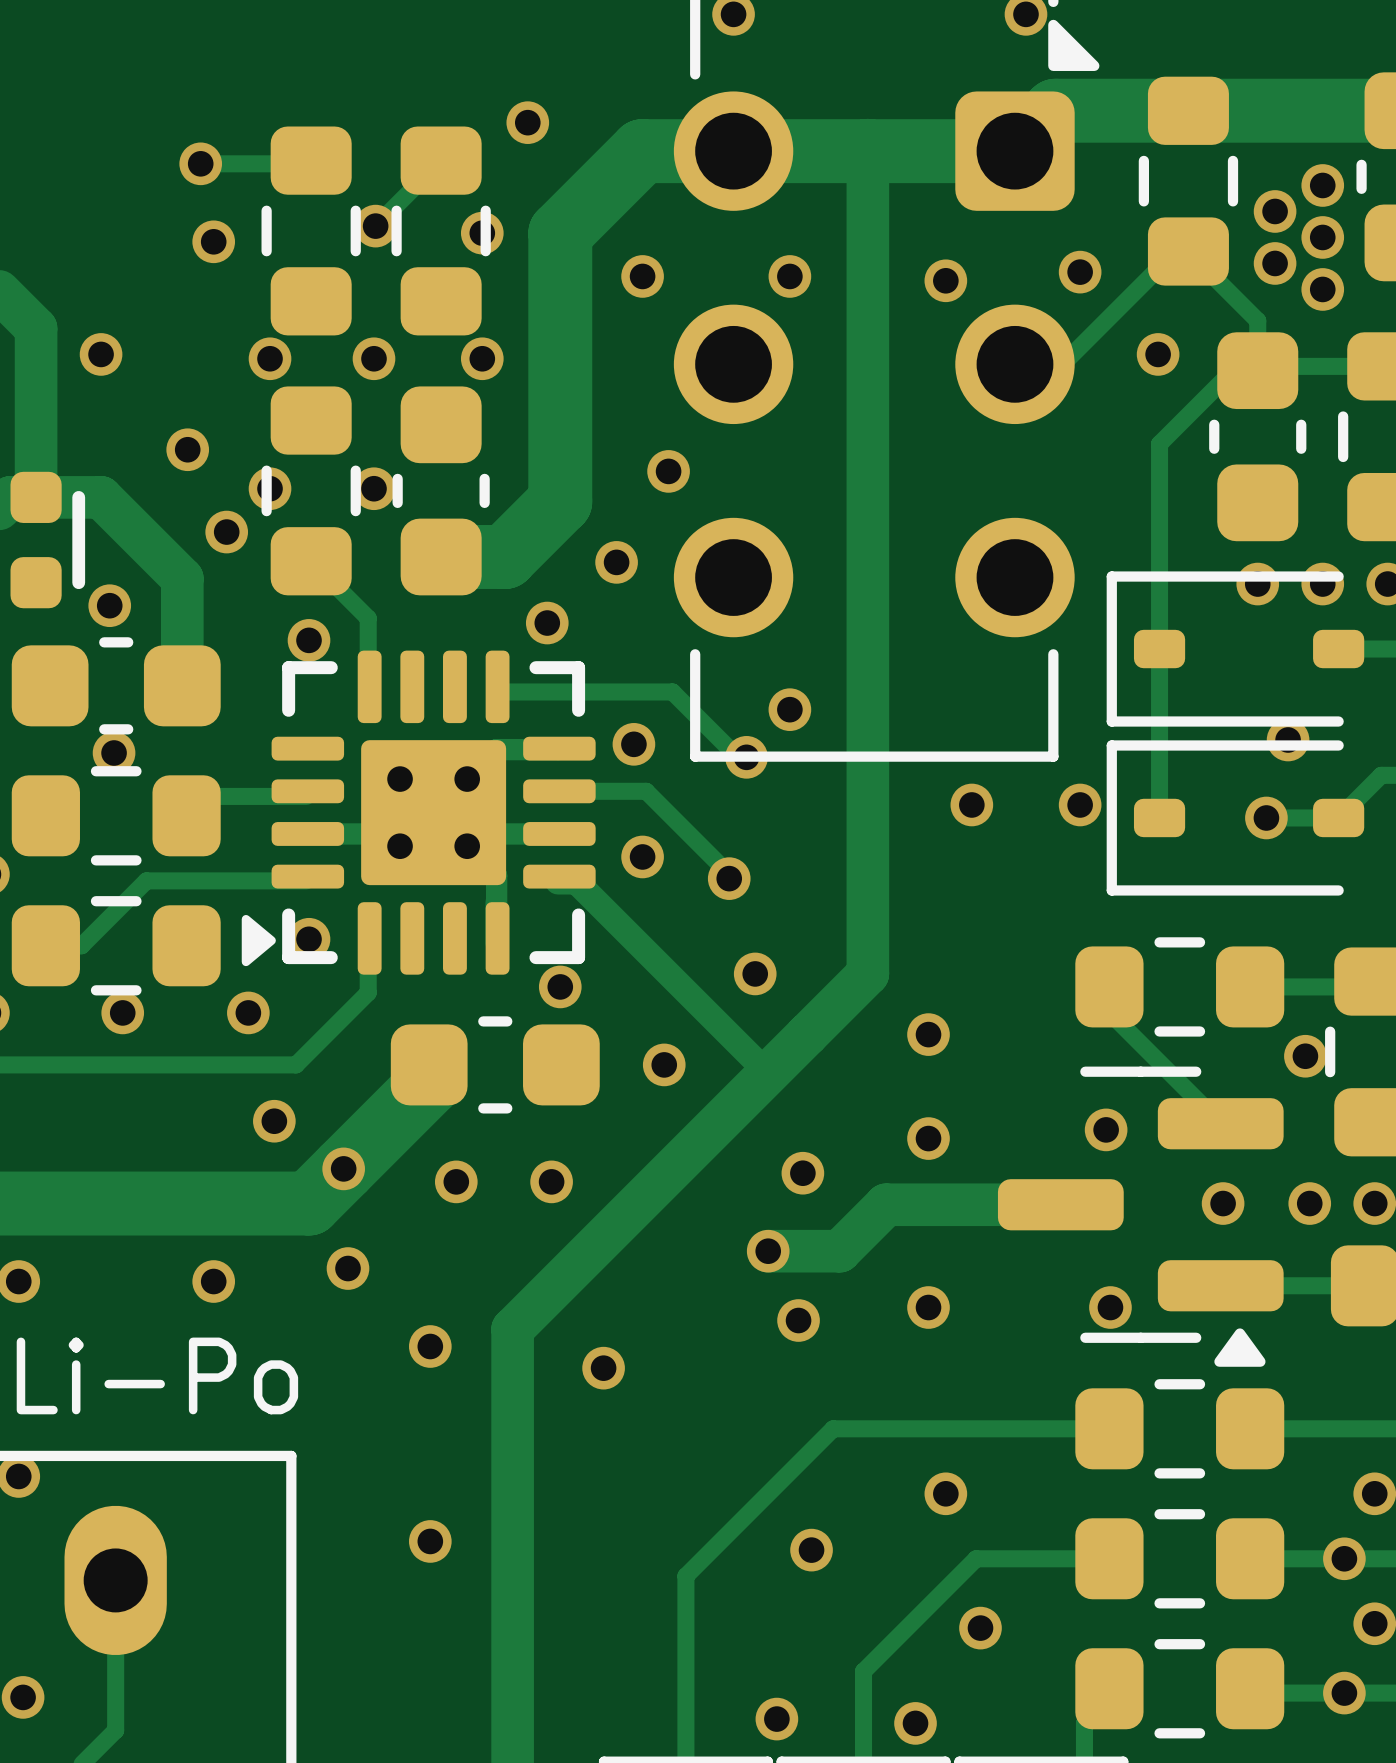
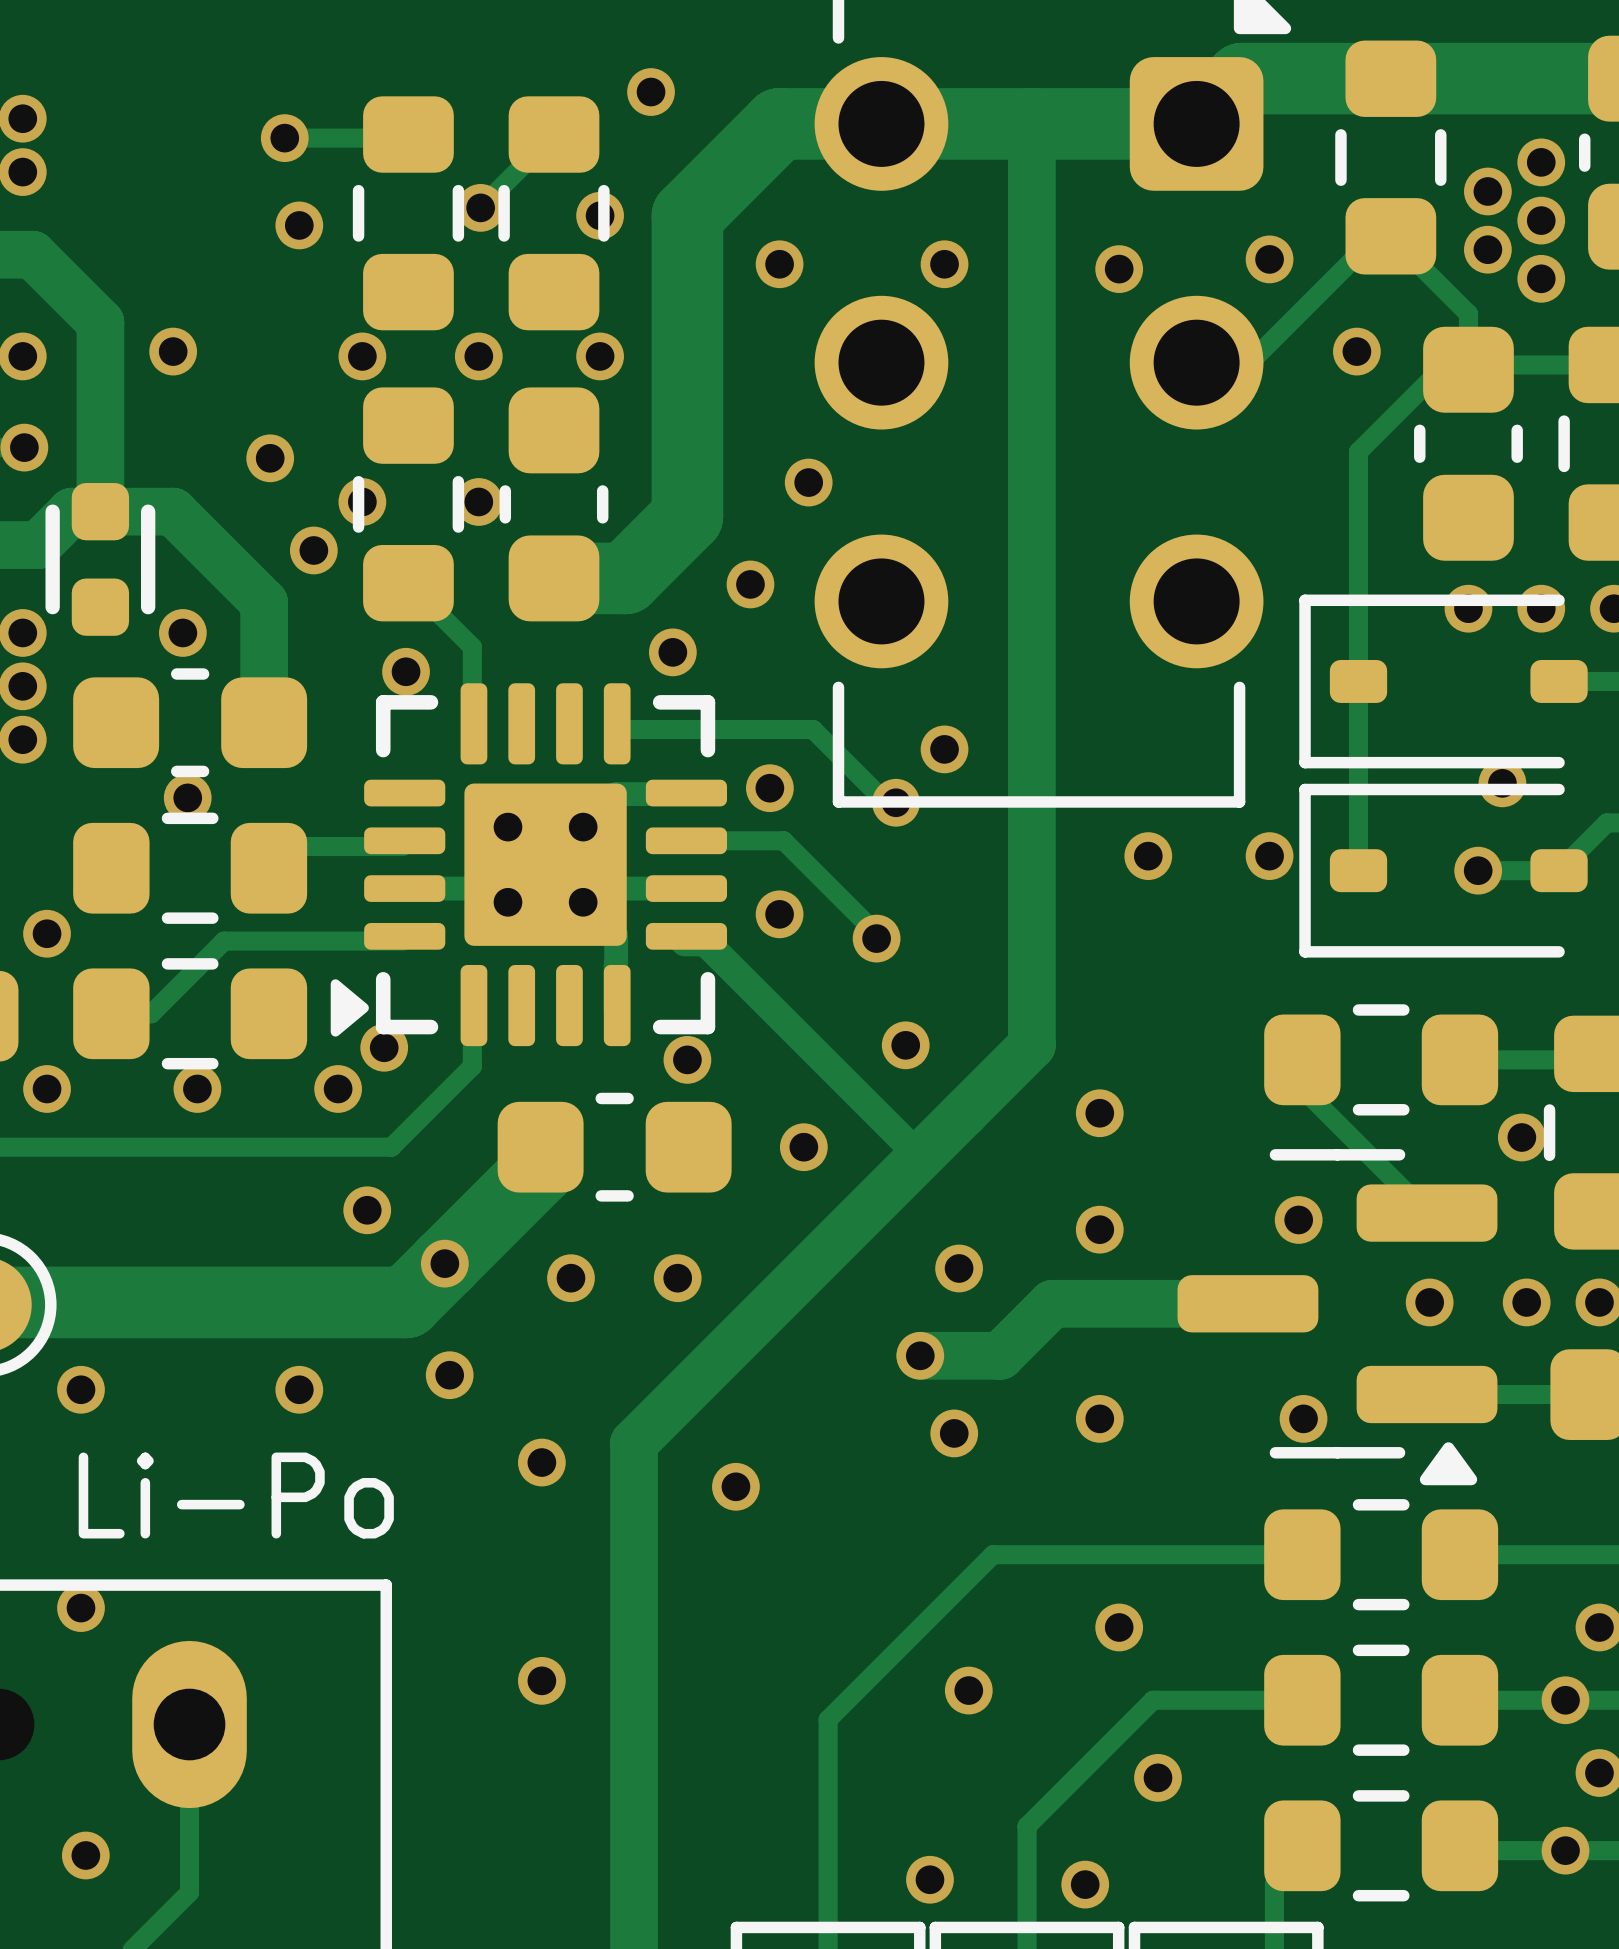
via position: (309, 939) -> (384, 1047)

